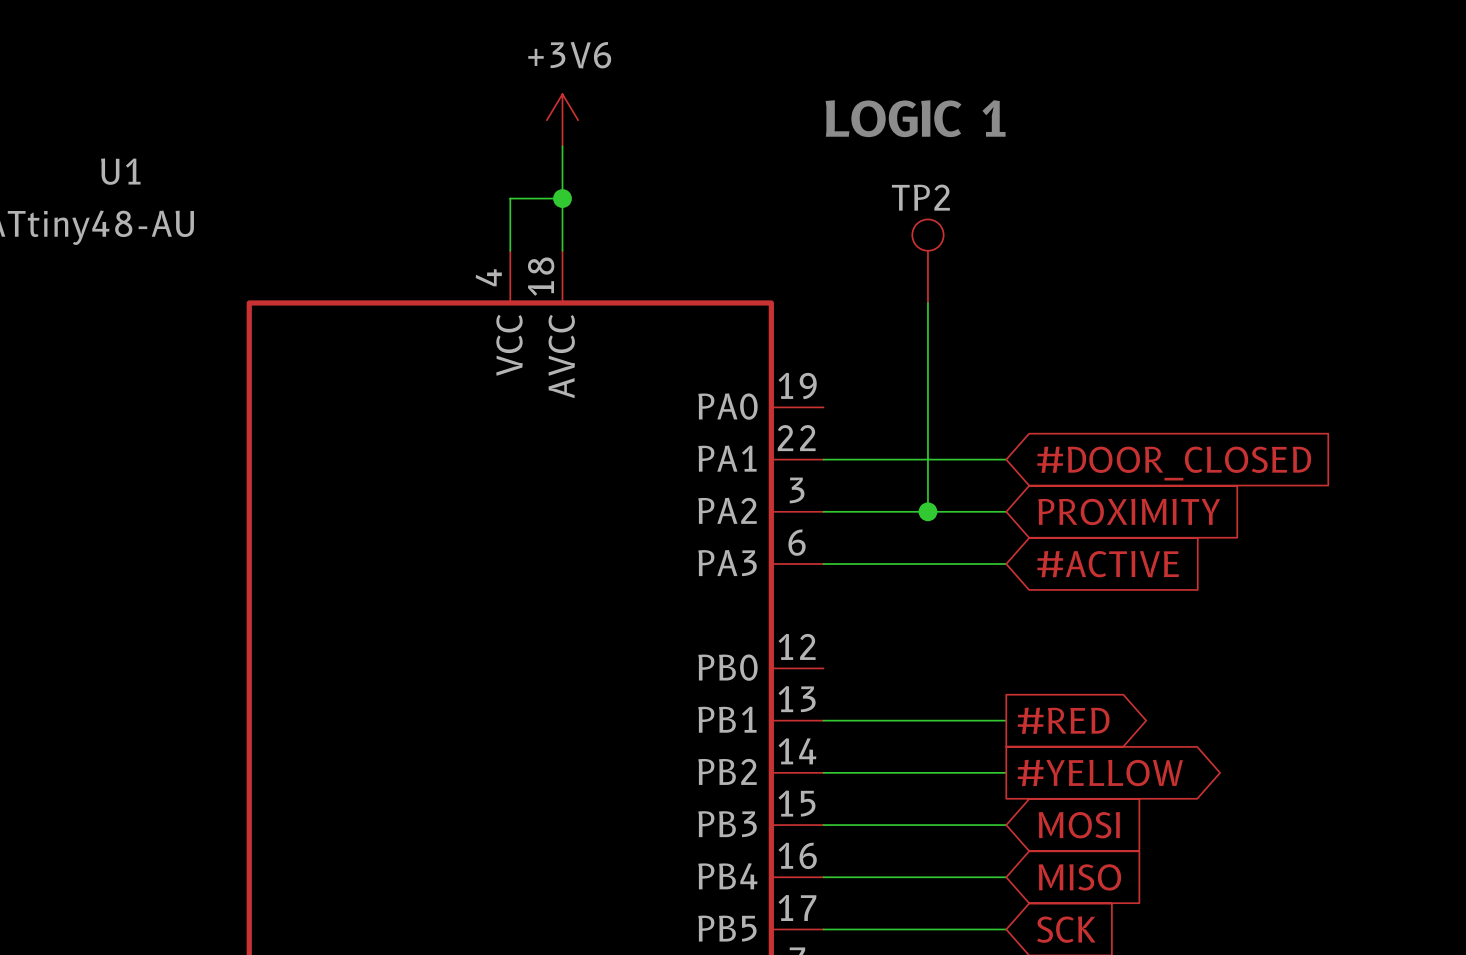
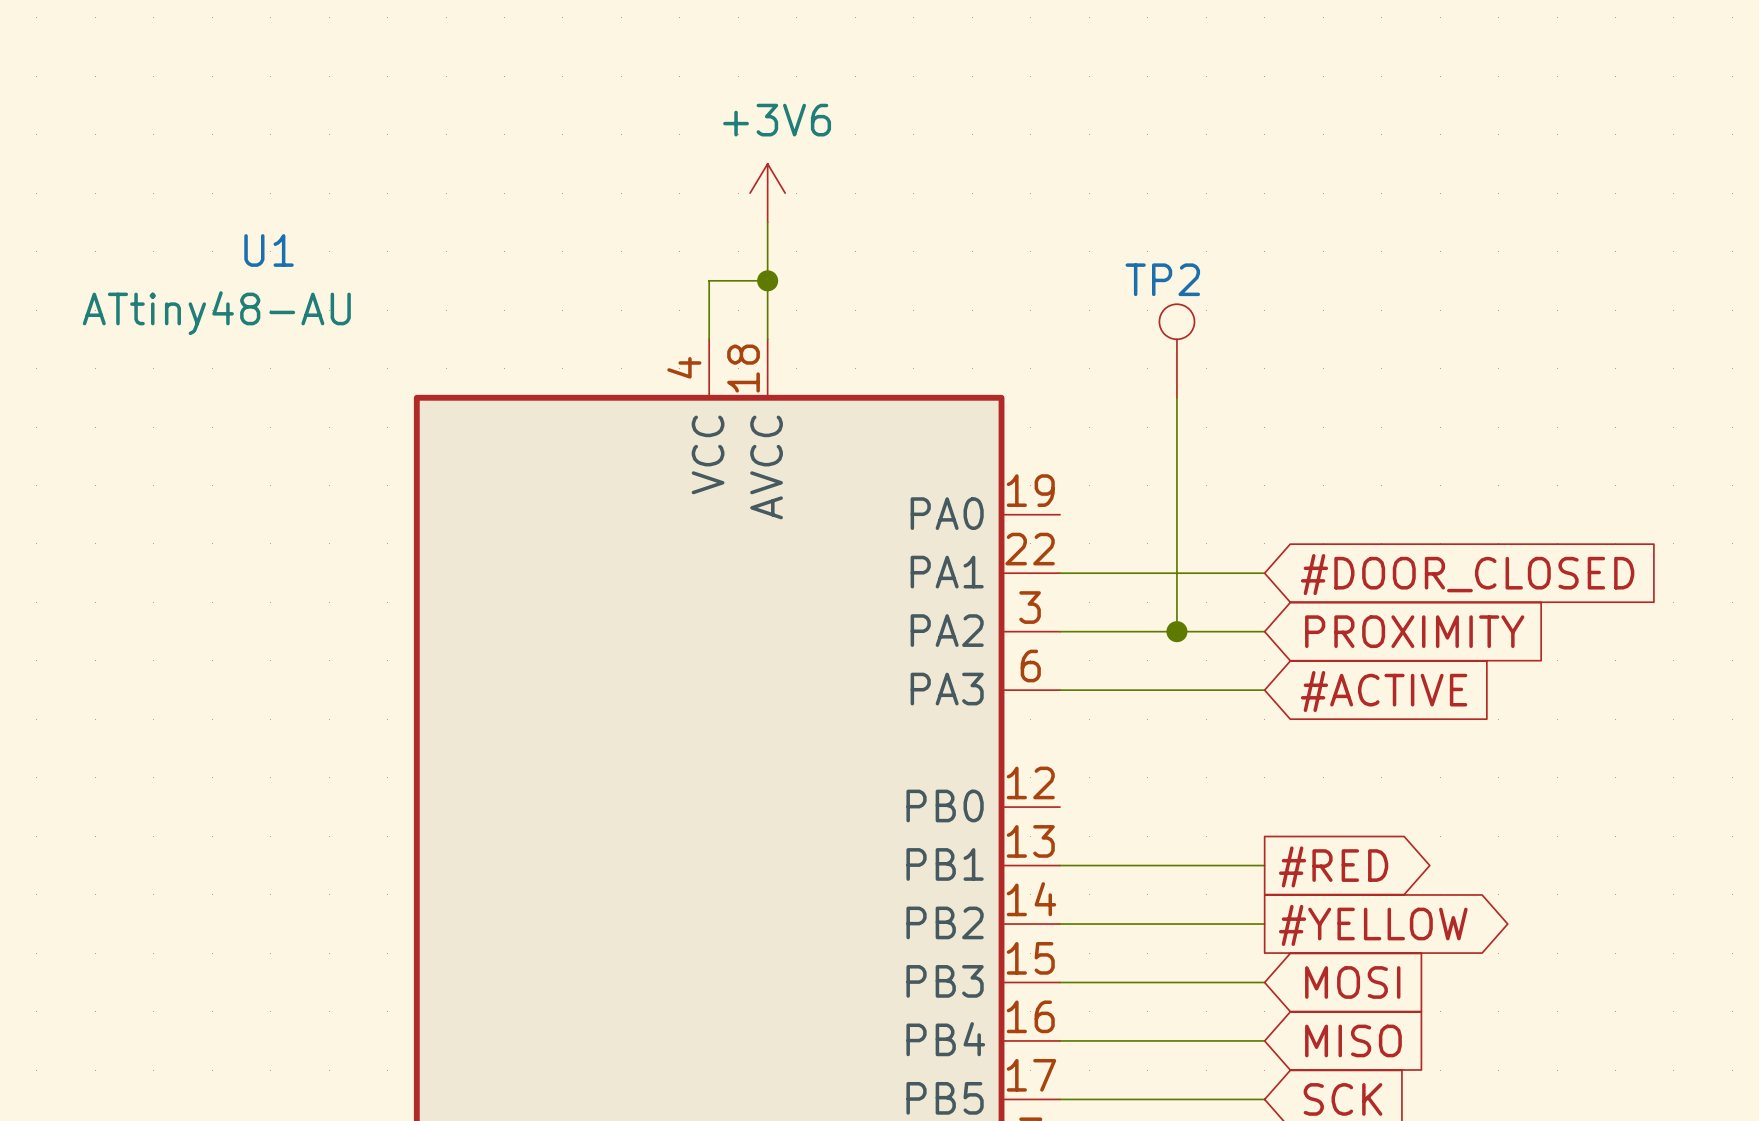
text: LOGIC 1 (915, 118) -> none

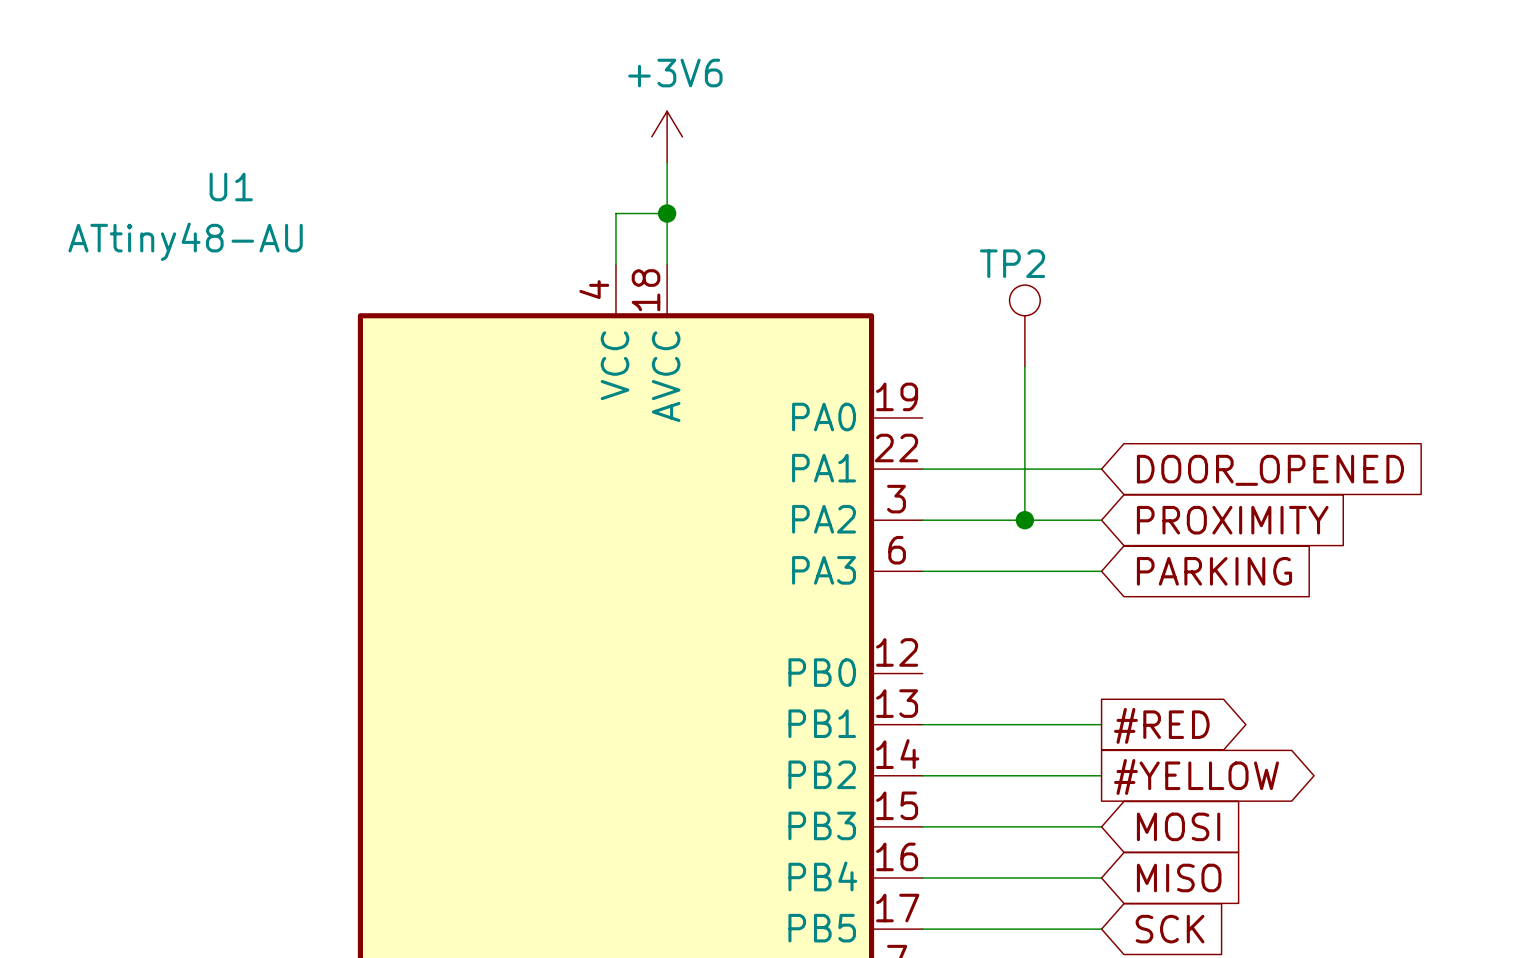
TP2 position: (1176, 350) -> (1024, 325)
global label: #DOOR_CLOSED (1467, 574) -> DOOR_OPENED (1270, 470)
global label: #ACTIVE (1384, 691) -> PARKING (1214, 571)

